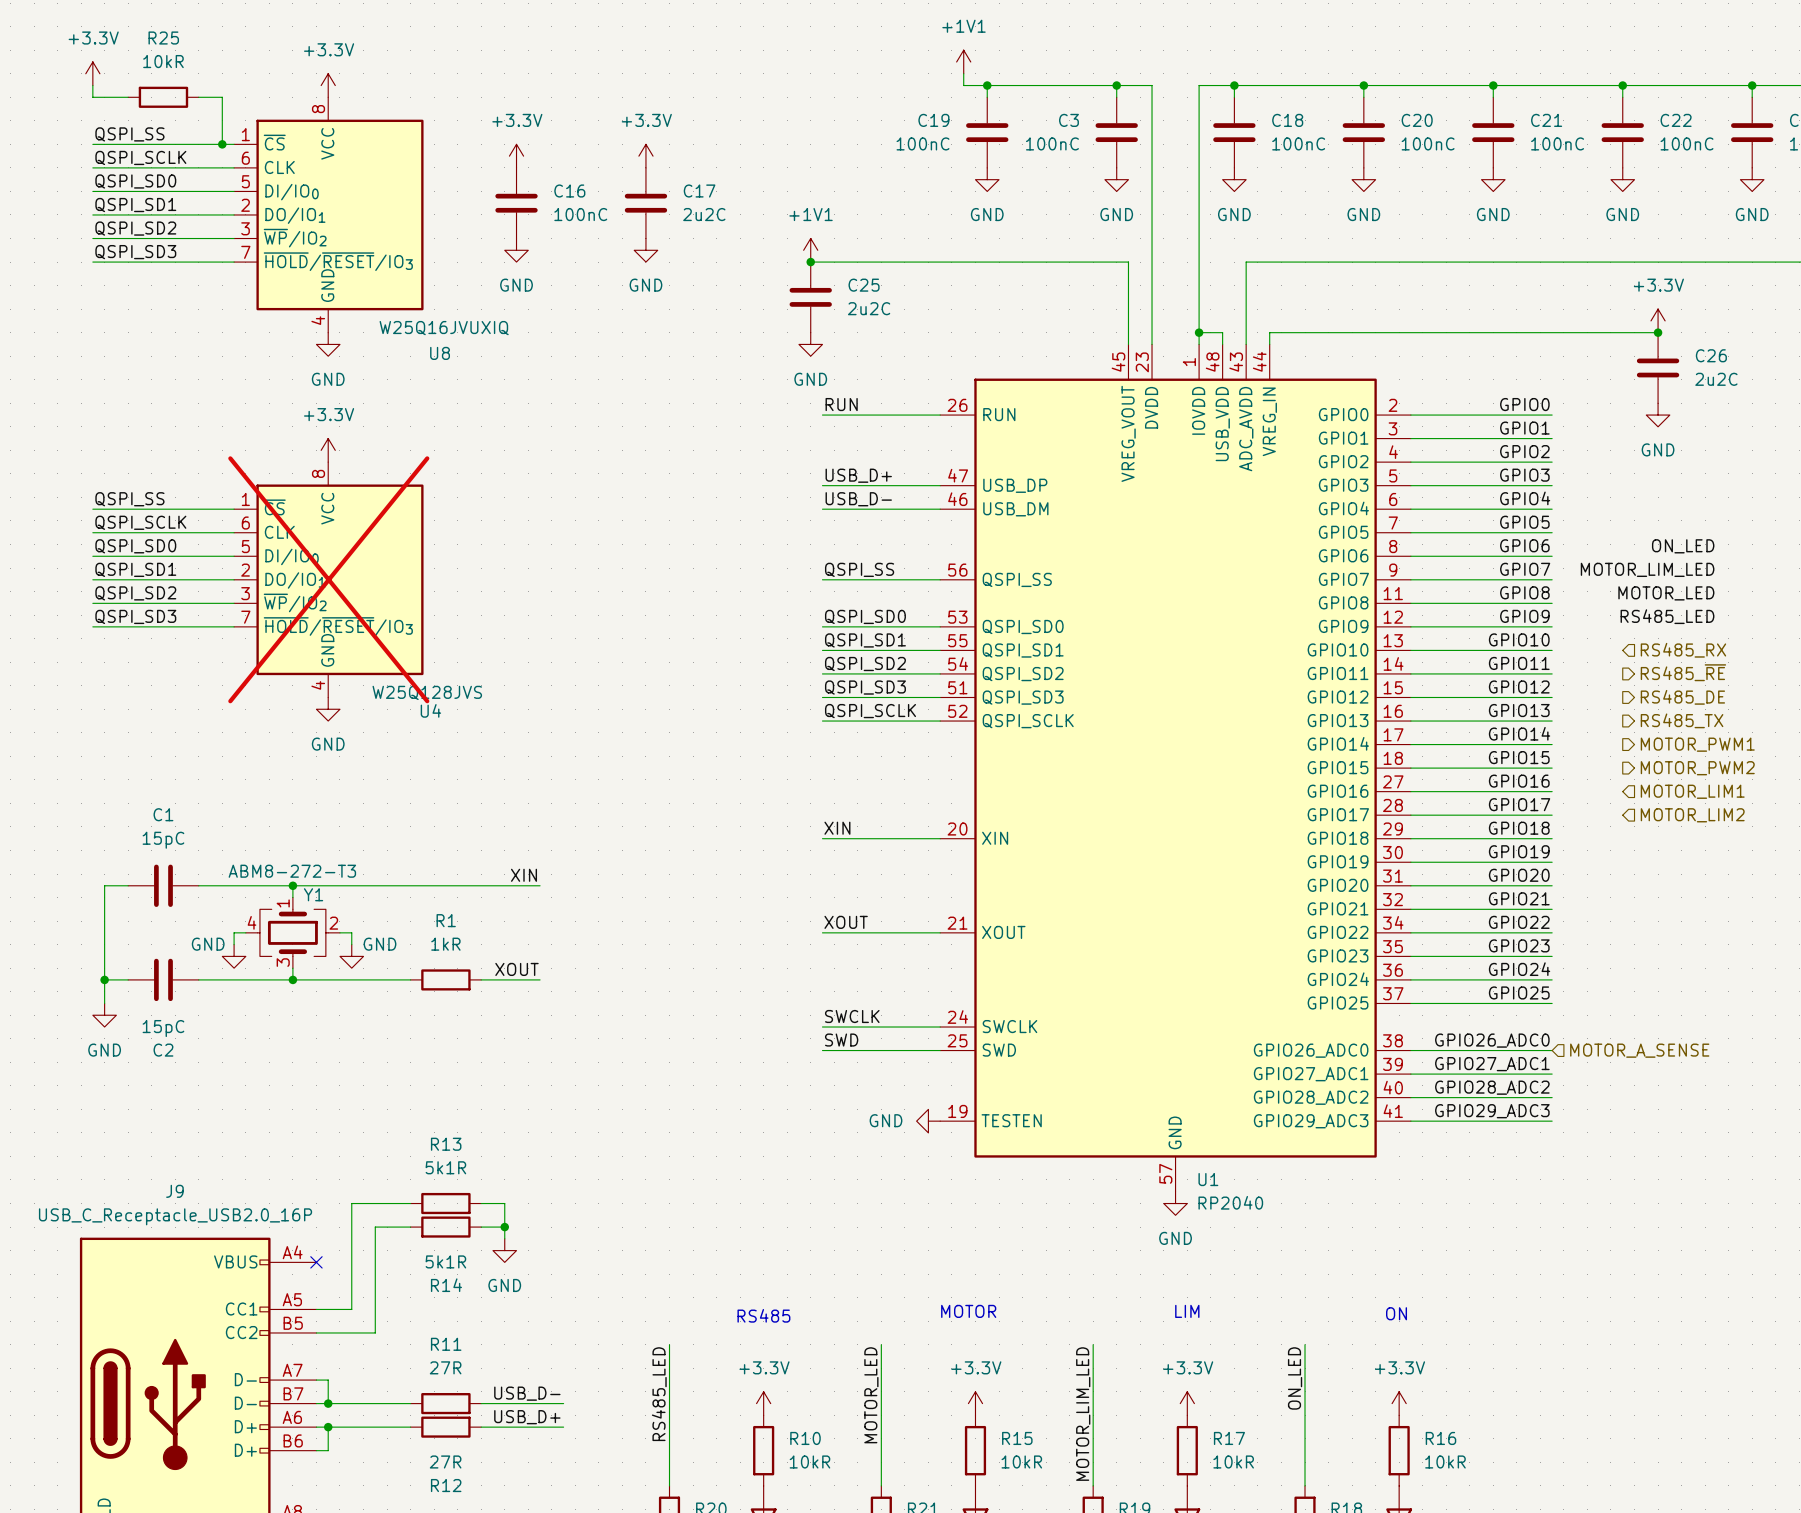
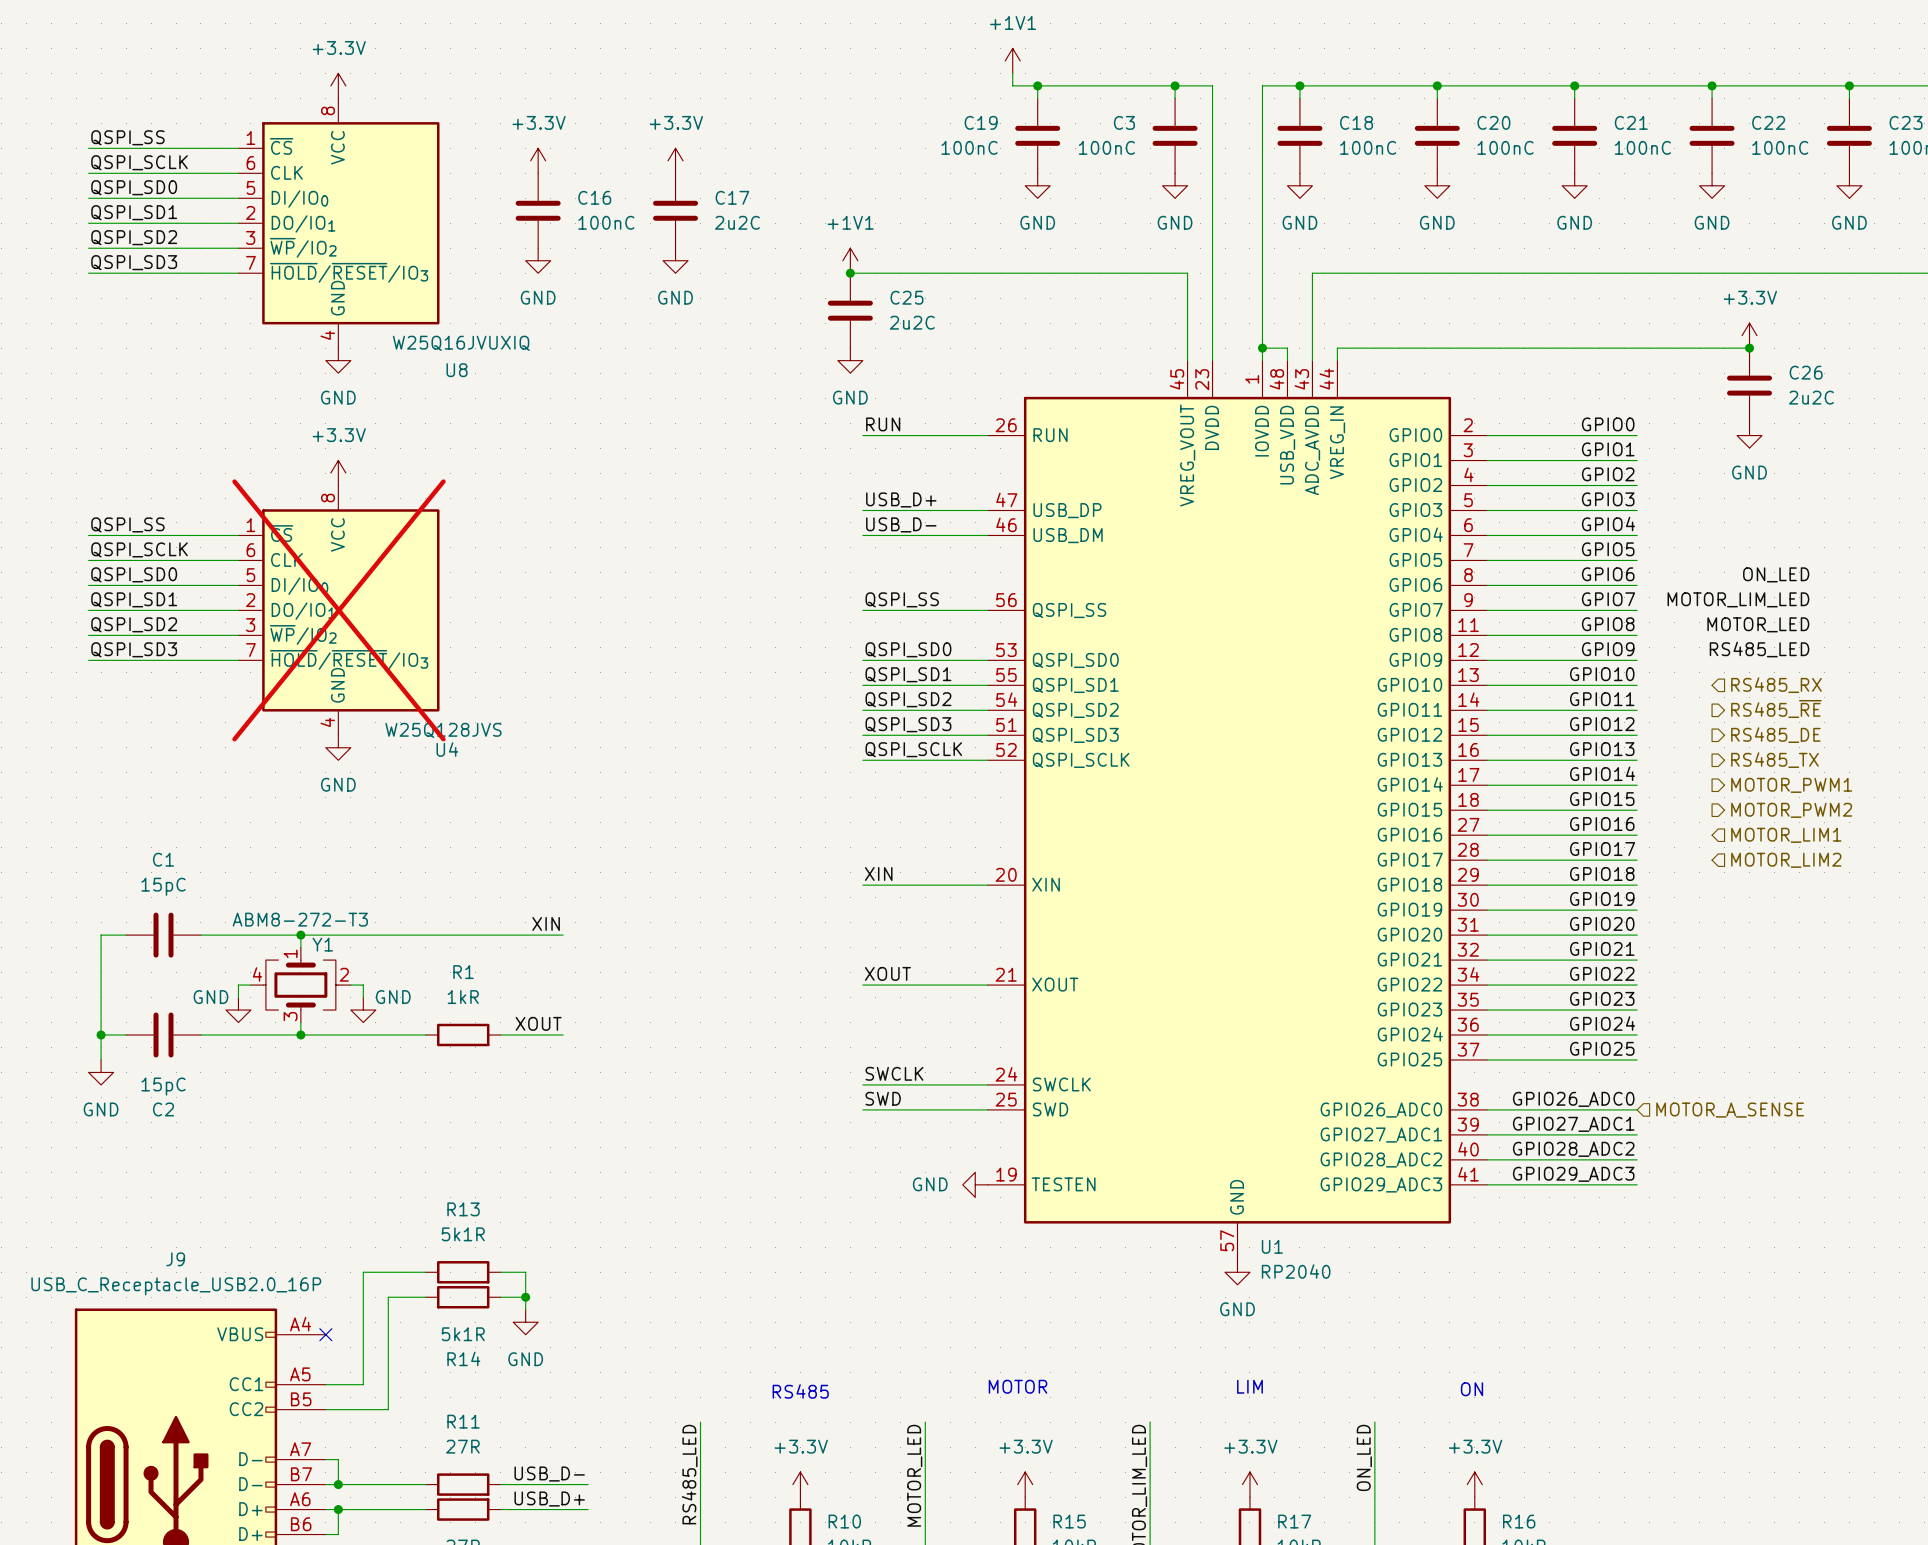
power symbol: +3.3V (92, 73) -> none
wire: (92, 85) (92, 97) (128, 97) -> none
R25: 10kR (163, 97) -> none
wire: (198, 97) (222, 97) (222, 144) -> none
junction: (222, 144) -> none

